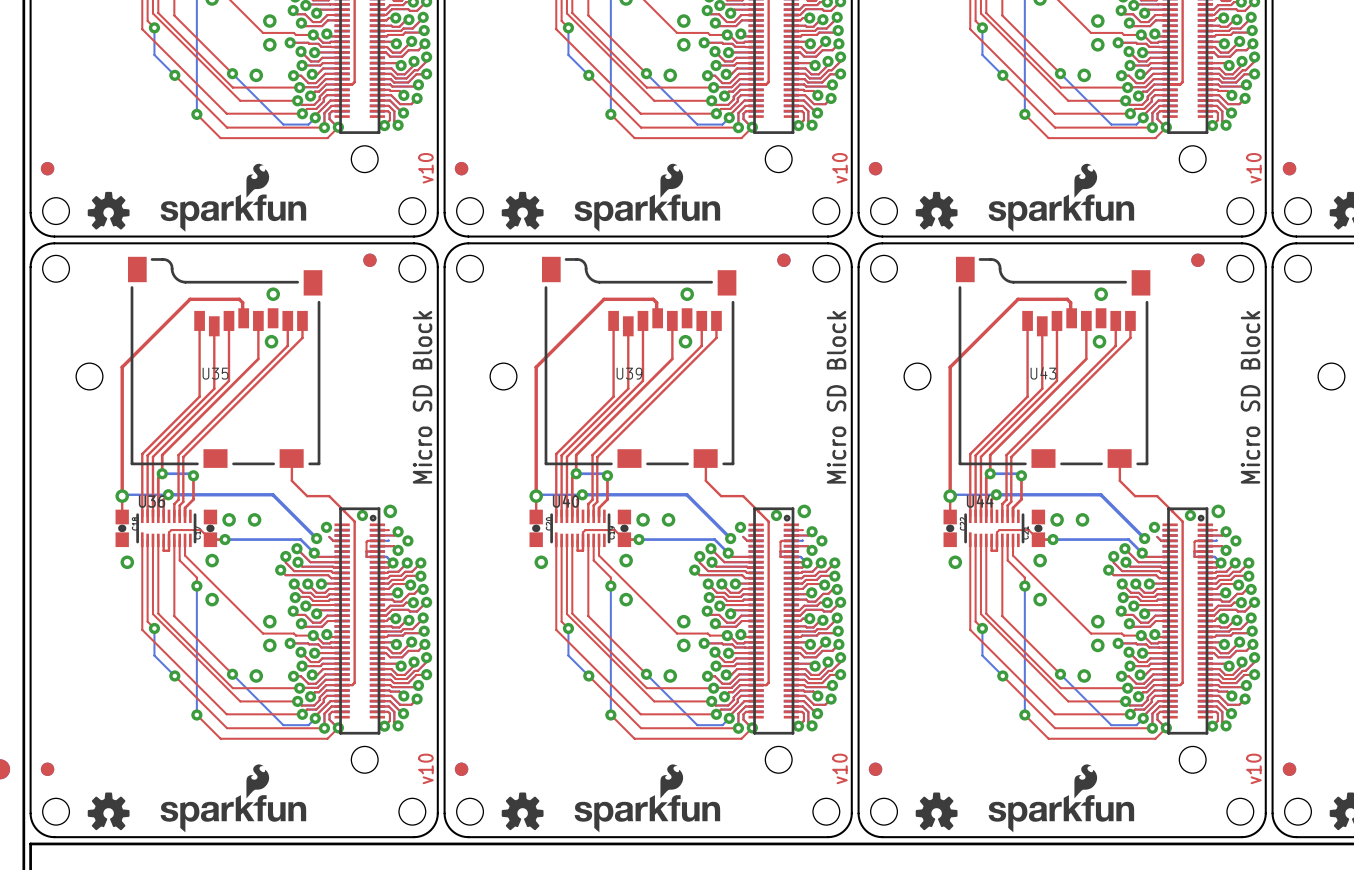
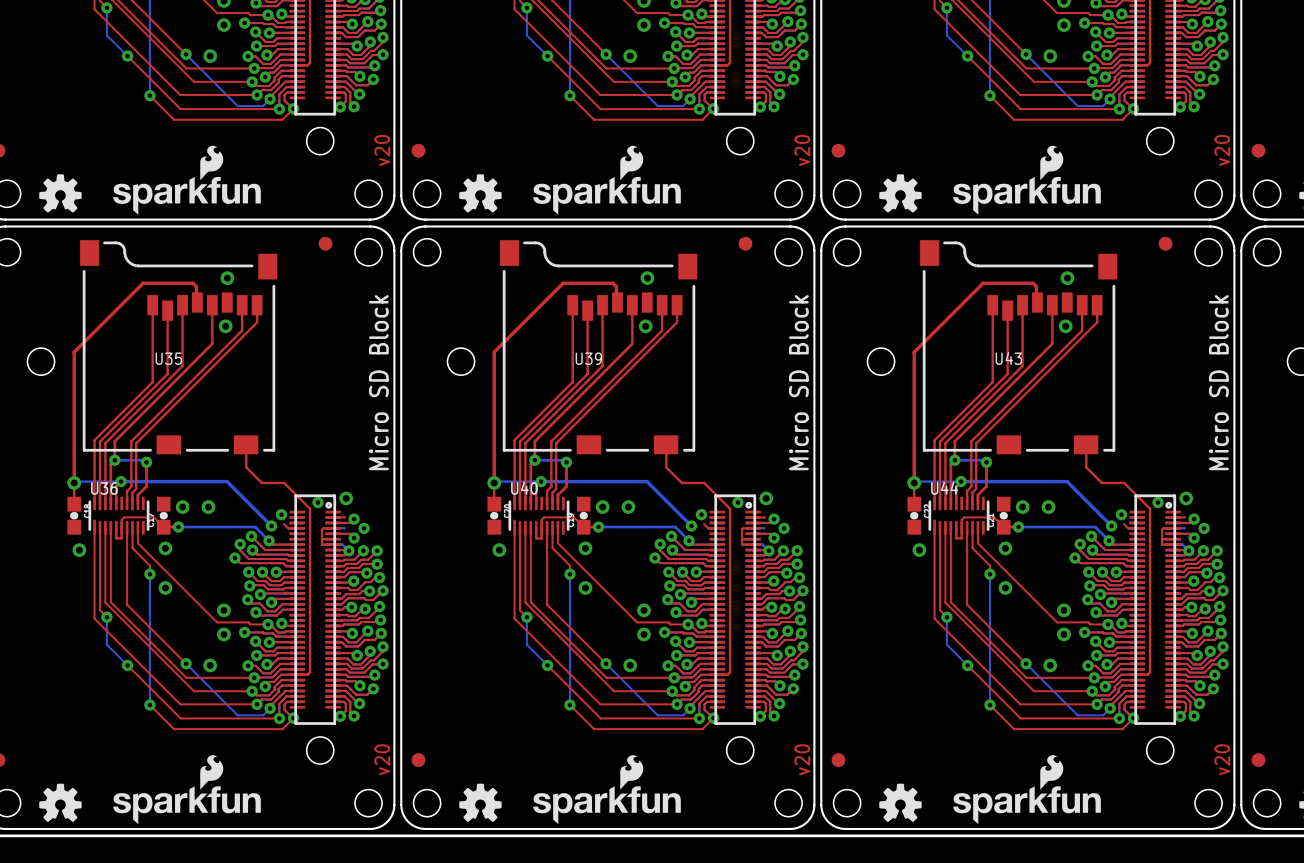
text: v10 (425, 168) -> v20 (382, 150)
text: v10 (839, 168) -> v20 (802, 150)
text: v10 (1253, 168) -> v20 (1222, 150)
text: v10 (425, 768) -> v20 (382, 759)
text: v10 (839, 768) -> v20 (802, 759)
text: v10 (1253, 768) -> v20 (1222, 759)

